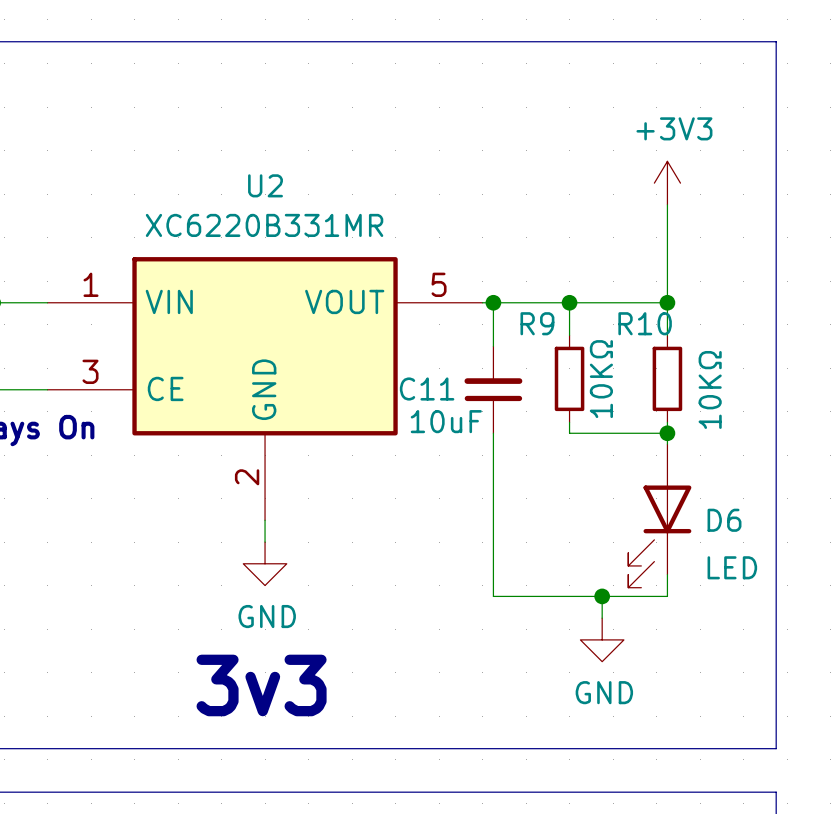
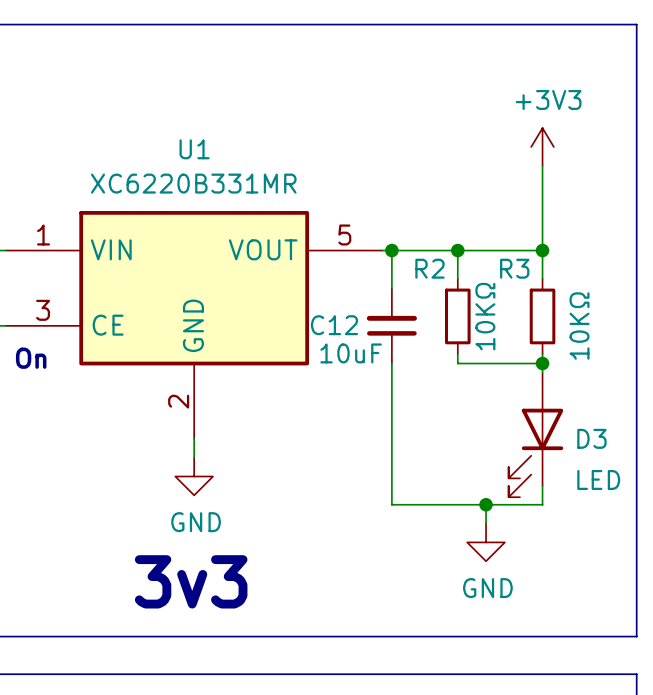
U2 name: U2 (265, 185) -> U1 (194, 149)
R9 name: R9 (537, 323) -> R2 (430, 268)
R10 name: R10 (645, 323) -> R3 (514, 268)
C11 name: C11 (427, 389) -> C12 (334, 325)
D6 name: D6 (724, 520) -> D3 (591, 438)

